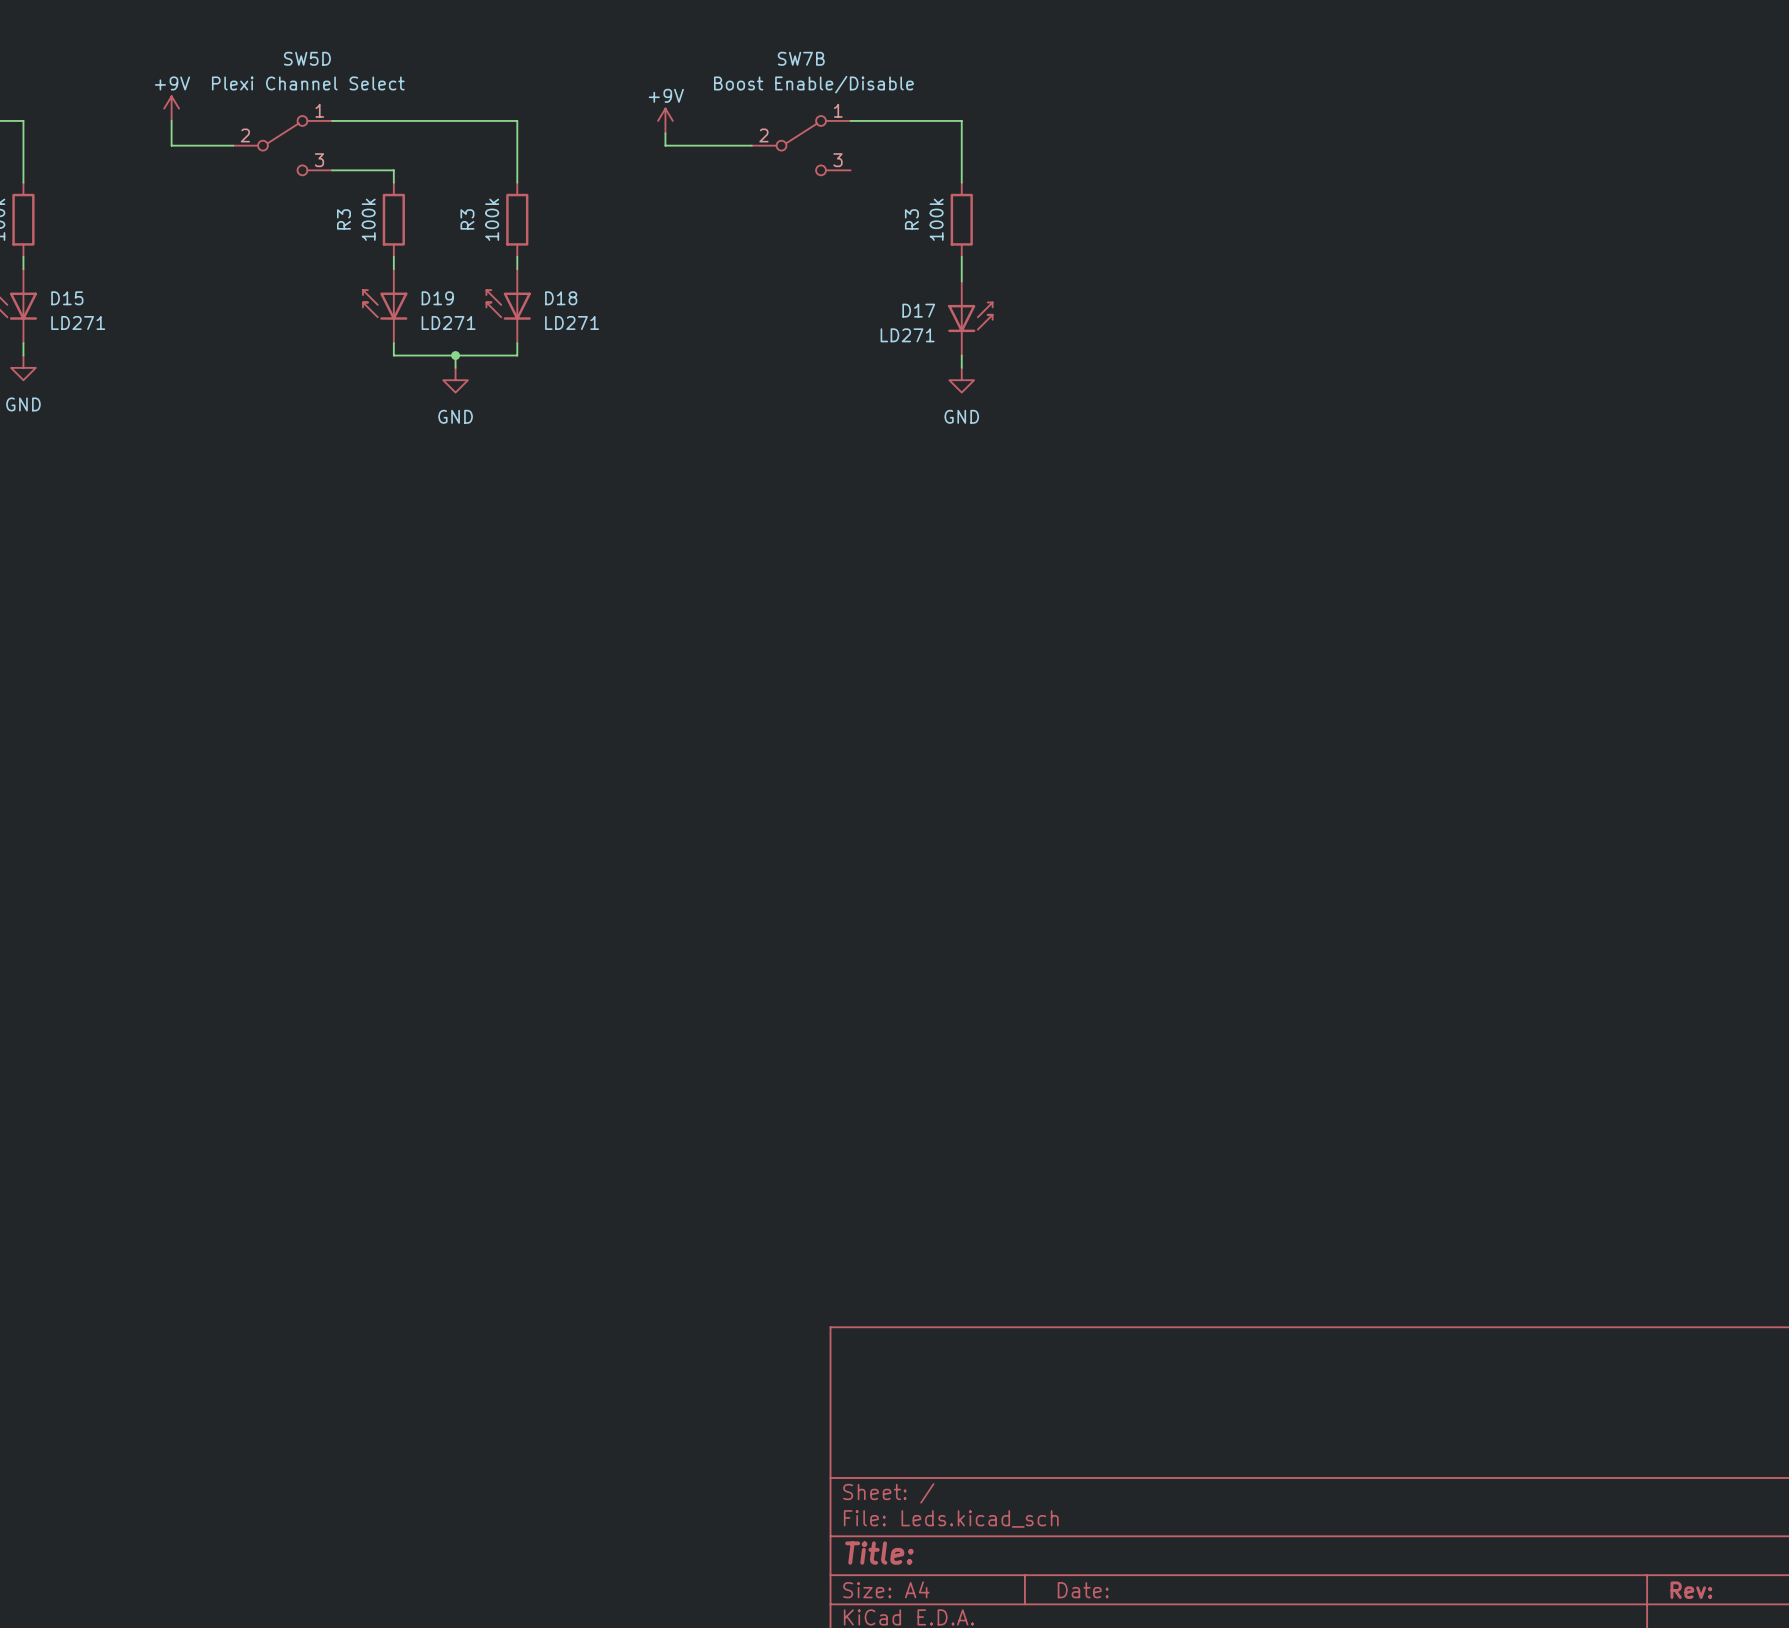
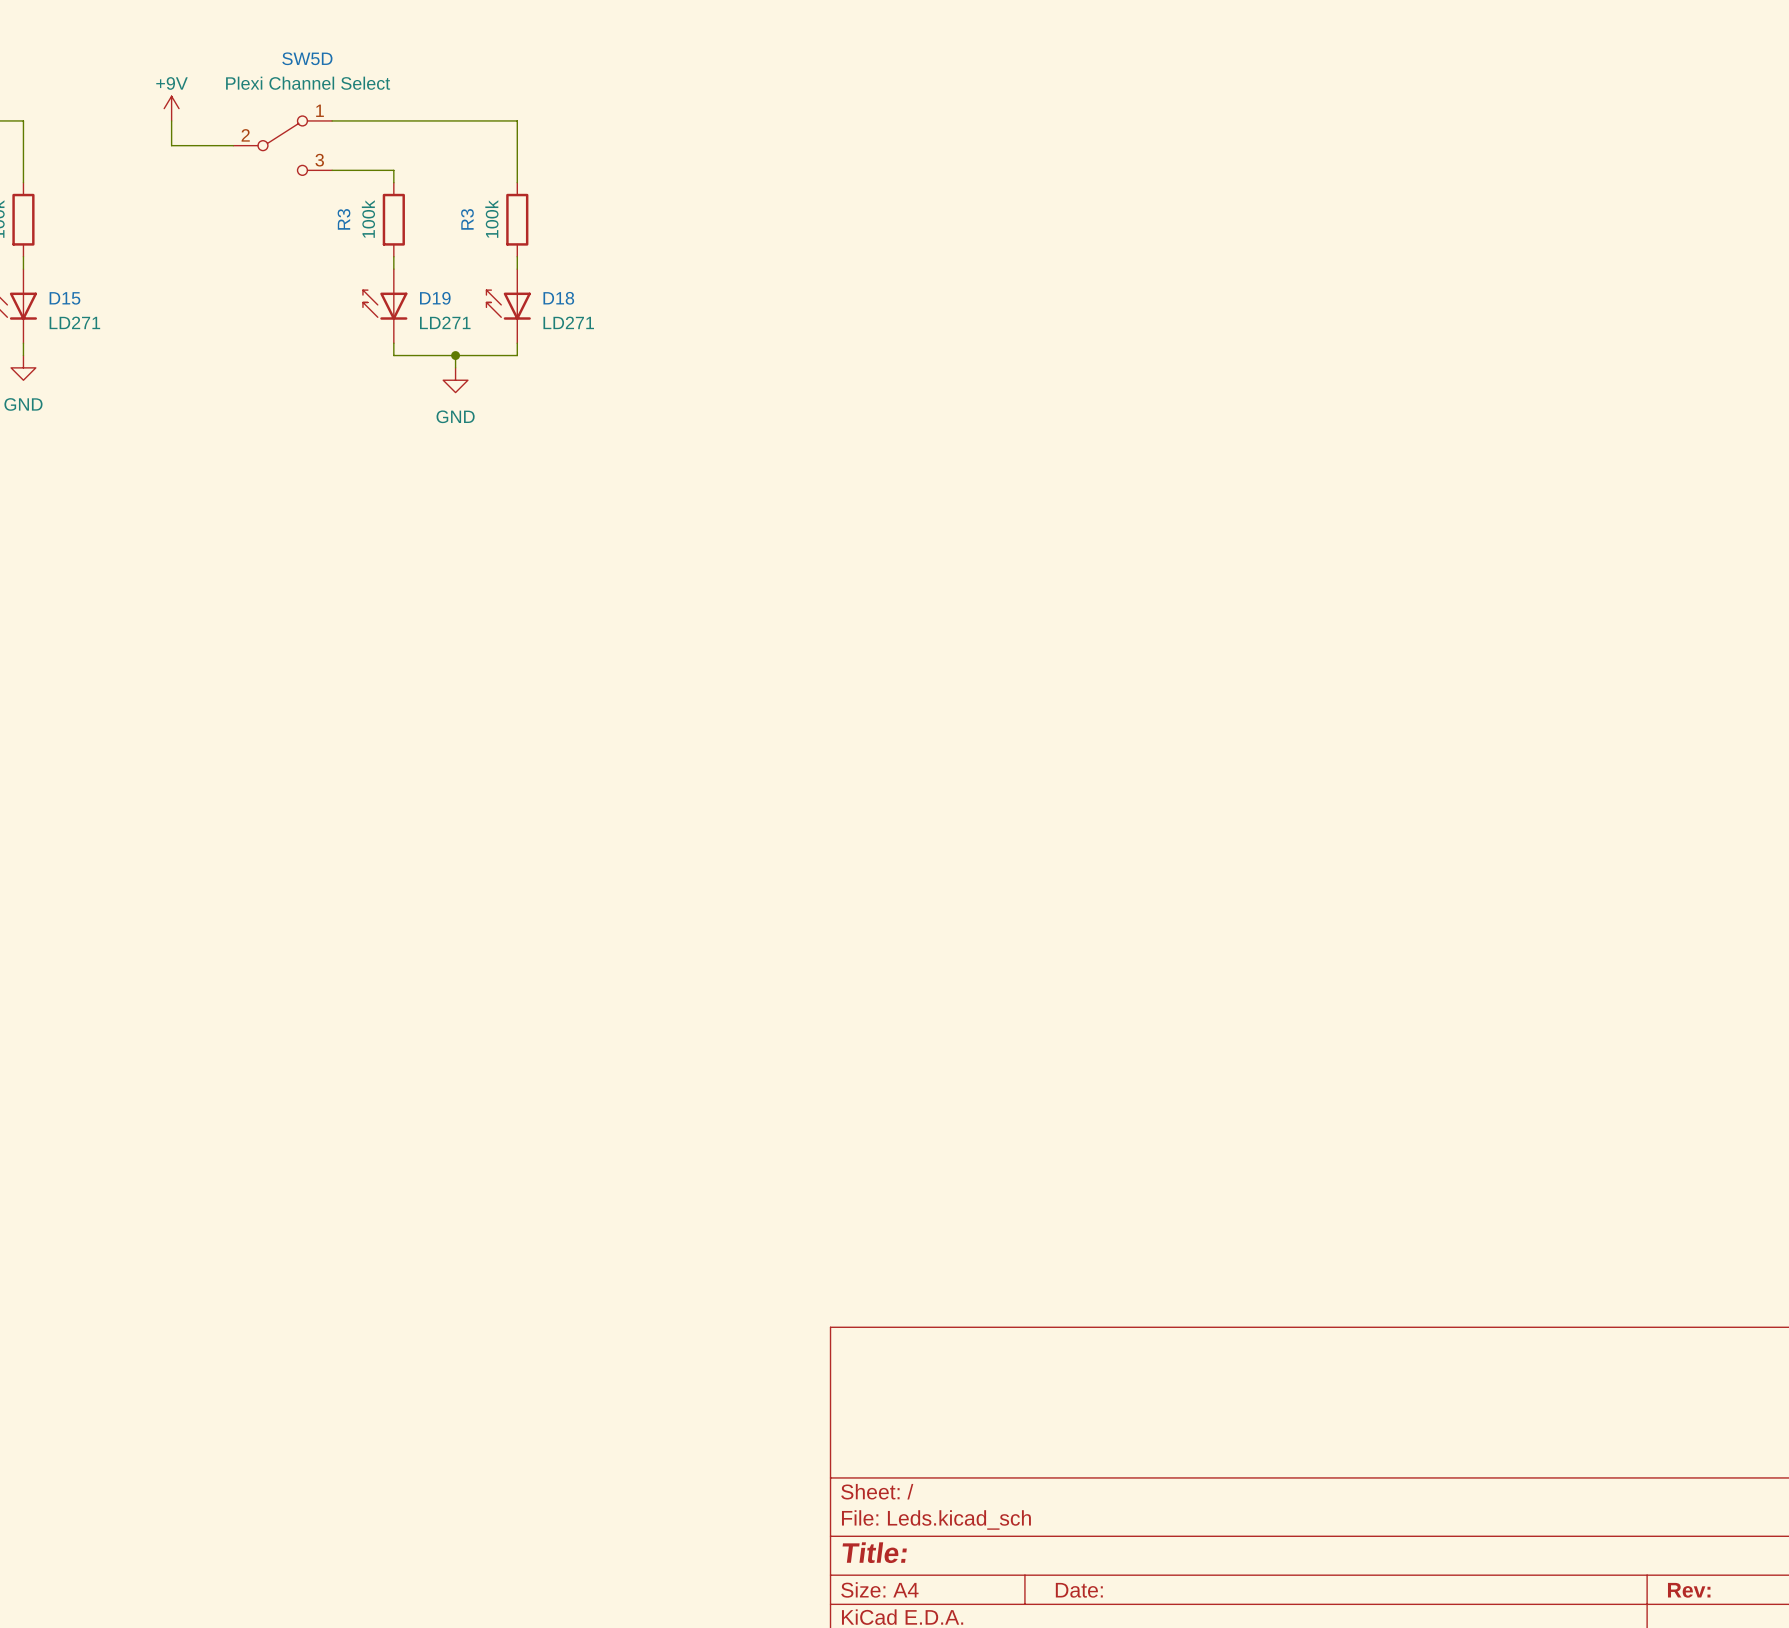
power symbol: +9V (665, 120) -> none
wire: (850, 120) (961, 120) (961, 182) -> none
wire: (665, 133) (665, 145) (751, 145) -> none
SW7B: Boost Enable/Disable (801, 145) -> none
R3: 100k (961, 219) -> none
wire: (961, 256) (961, 281) -> none
D17: LD271 (970, 318) -> none
wire: (961, 355) (961, 367) -> none
power symbol: GND (961, 380) -> none

